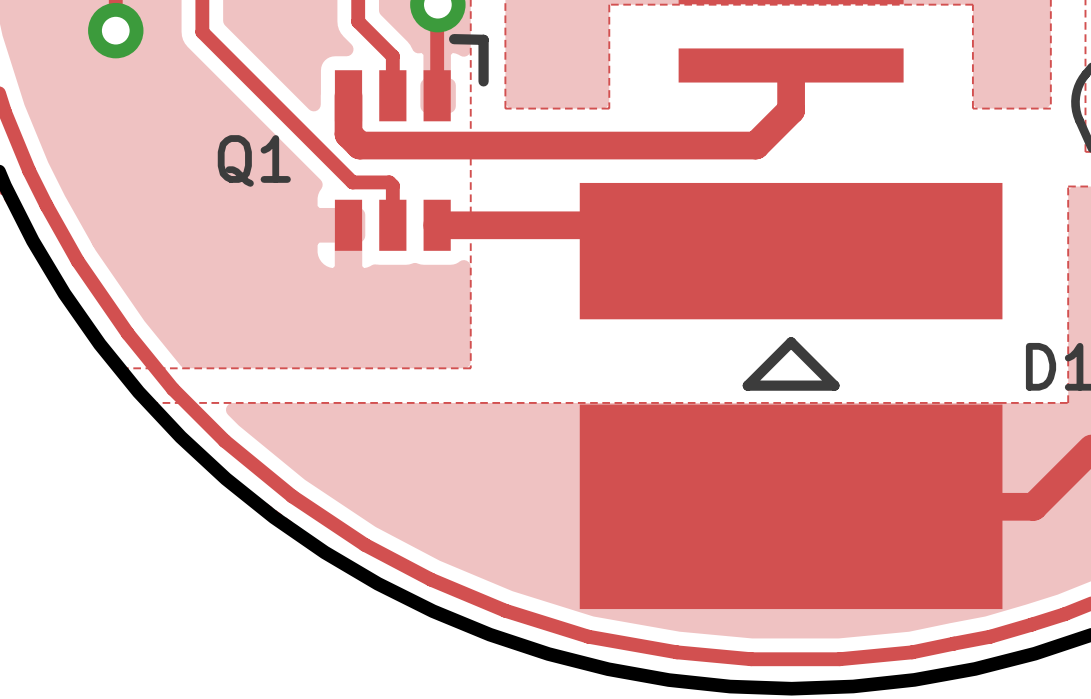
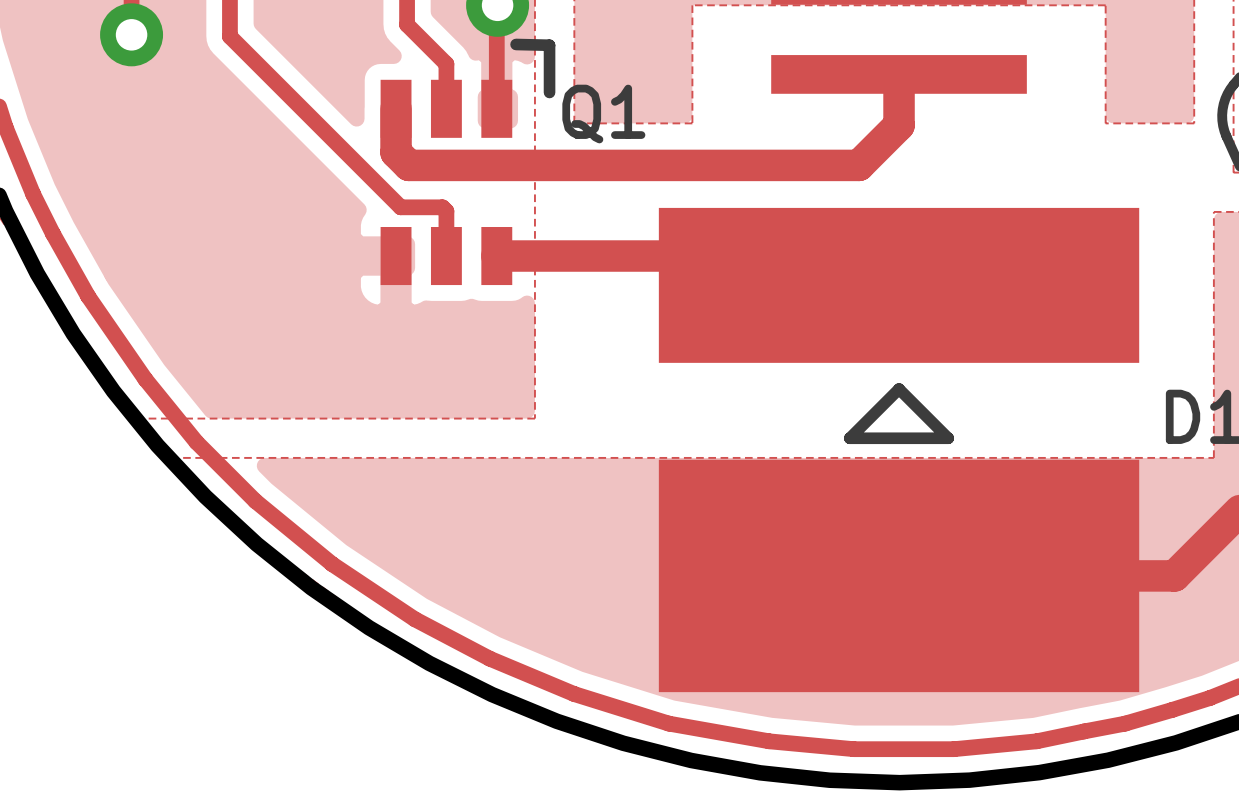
Q1 name position: Q1 (254, 160) -> Q1 (603, 114)

